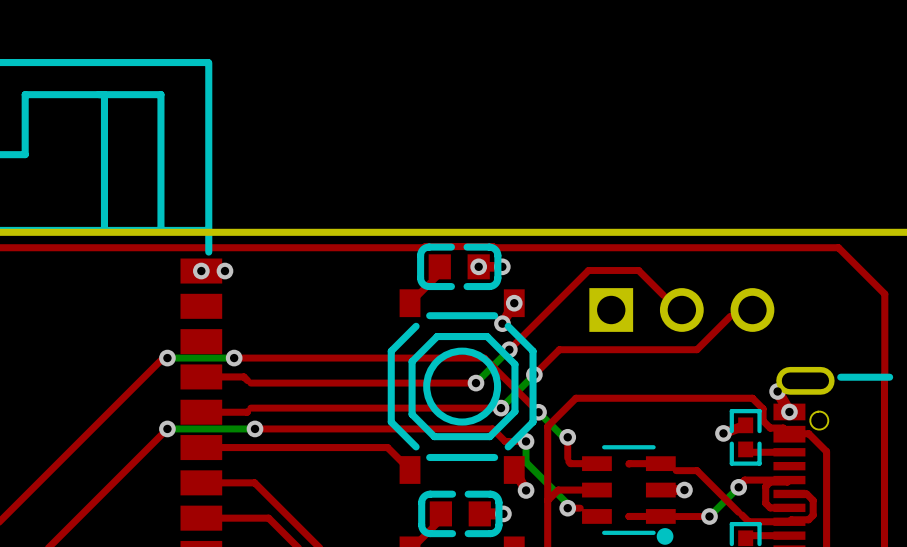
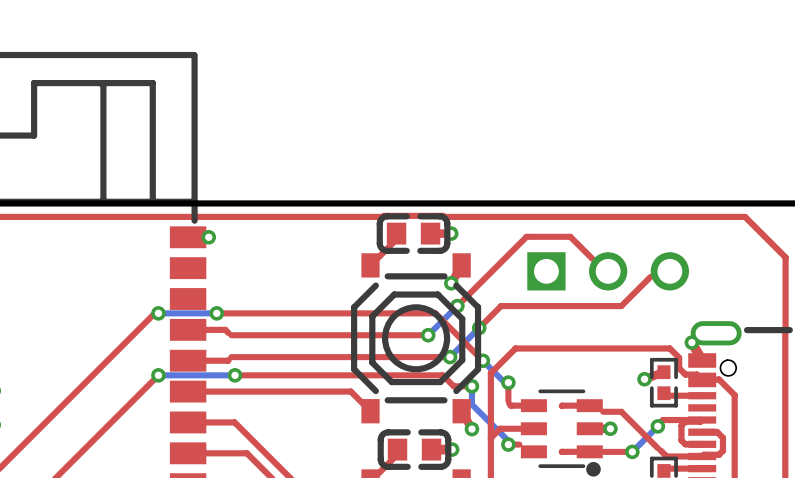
via: (478, 266) -> none
via: (201, 271) -> none
via: (514, 303) -> none
via: (789, 411) -> none

